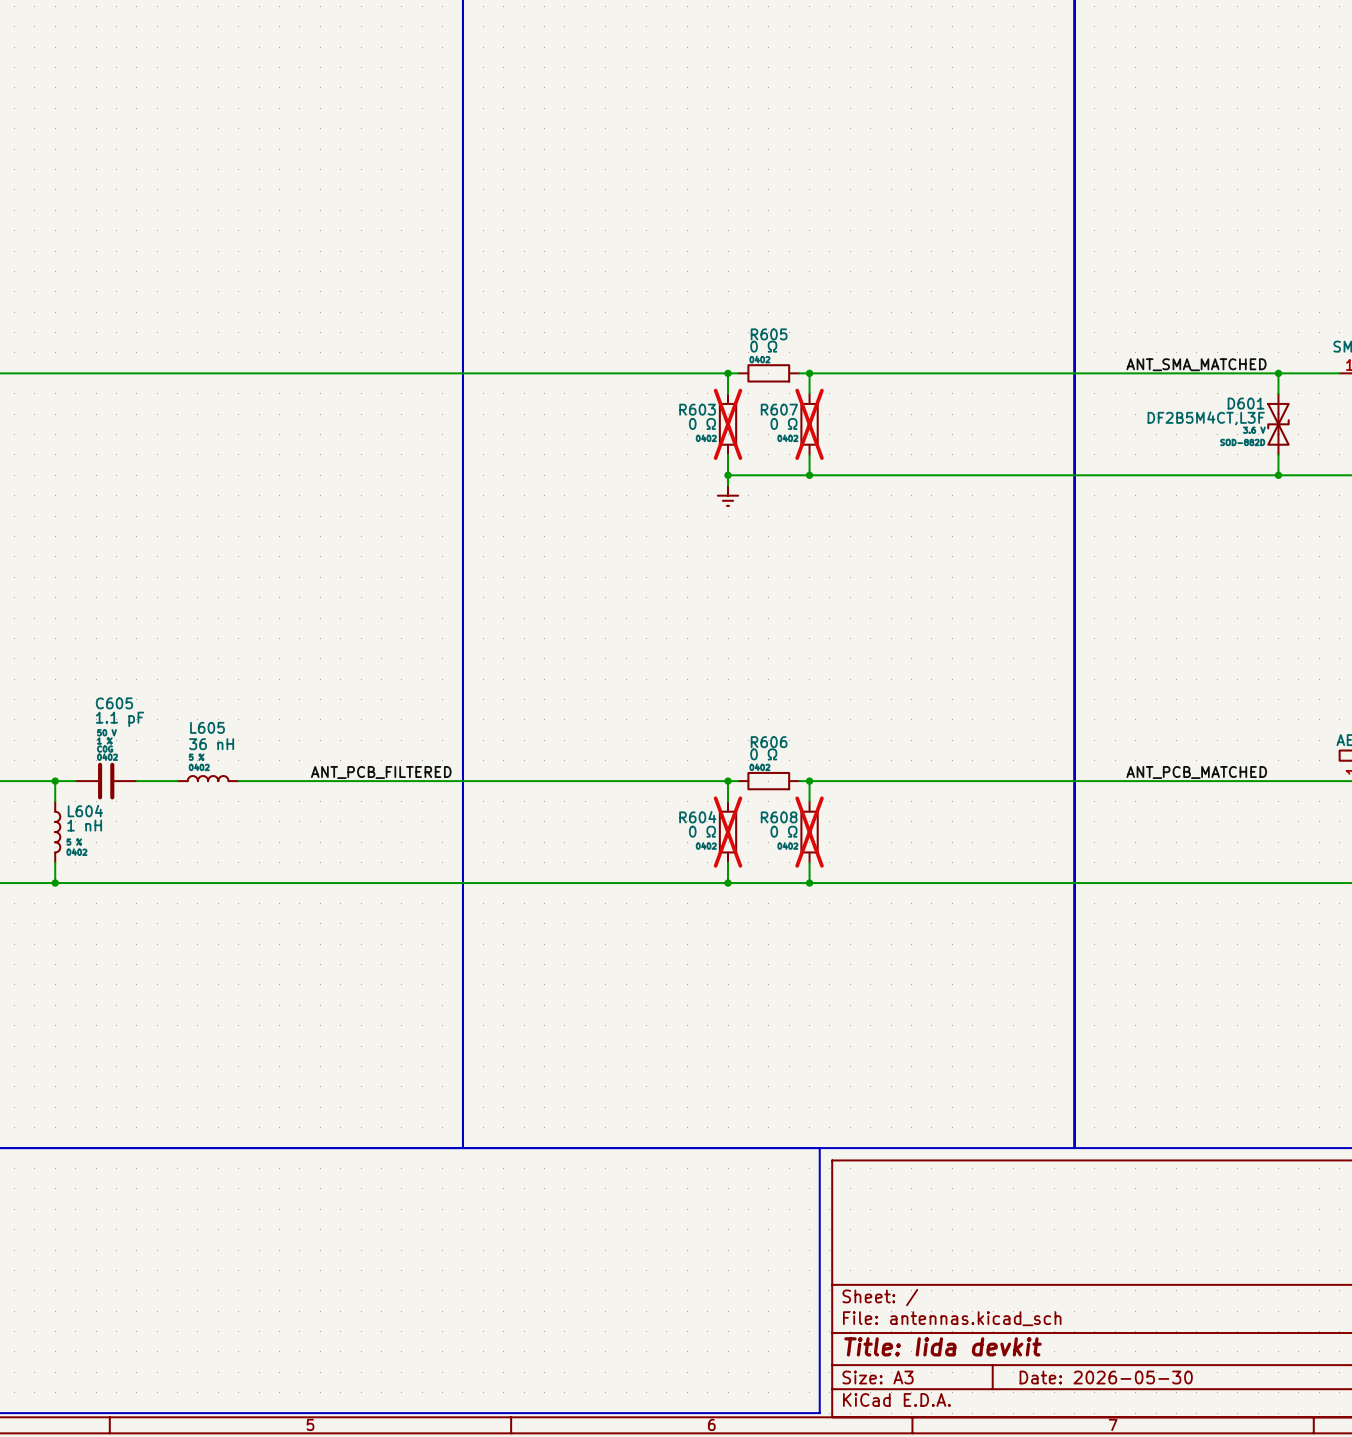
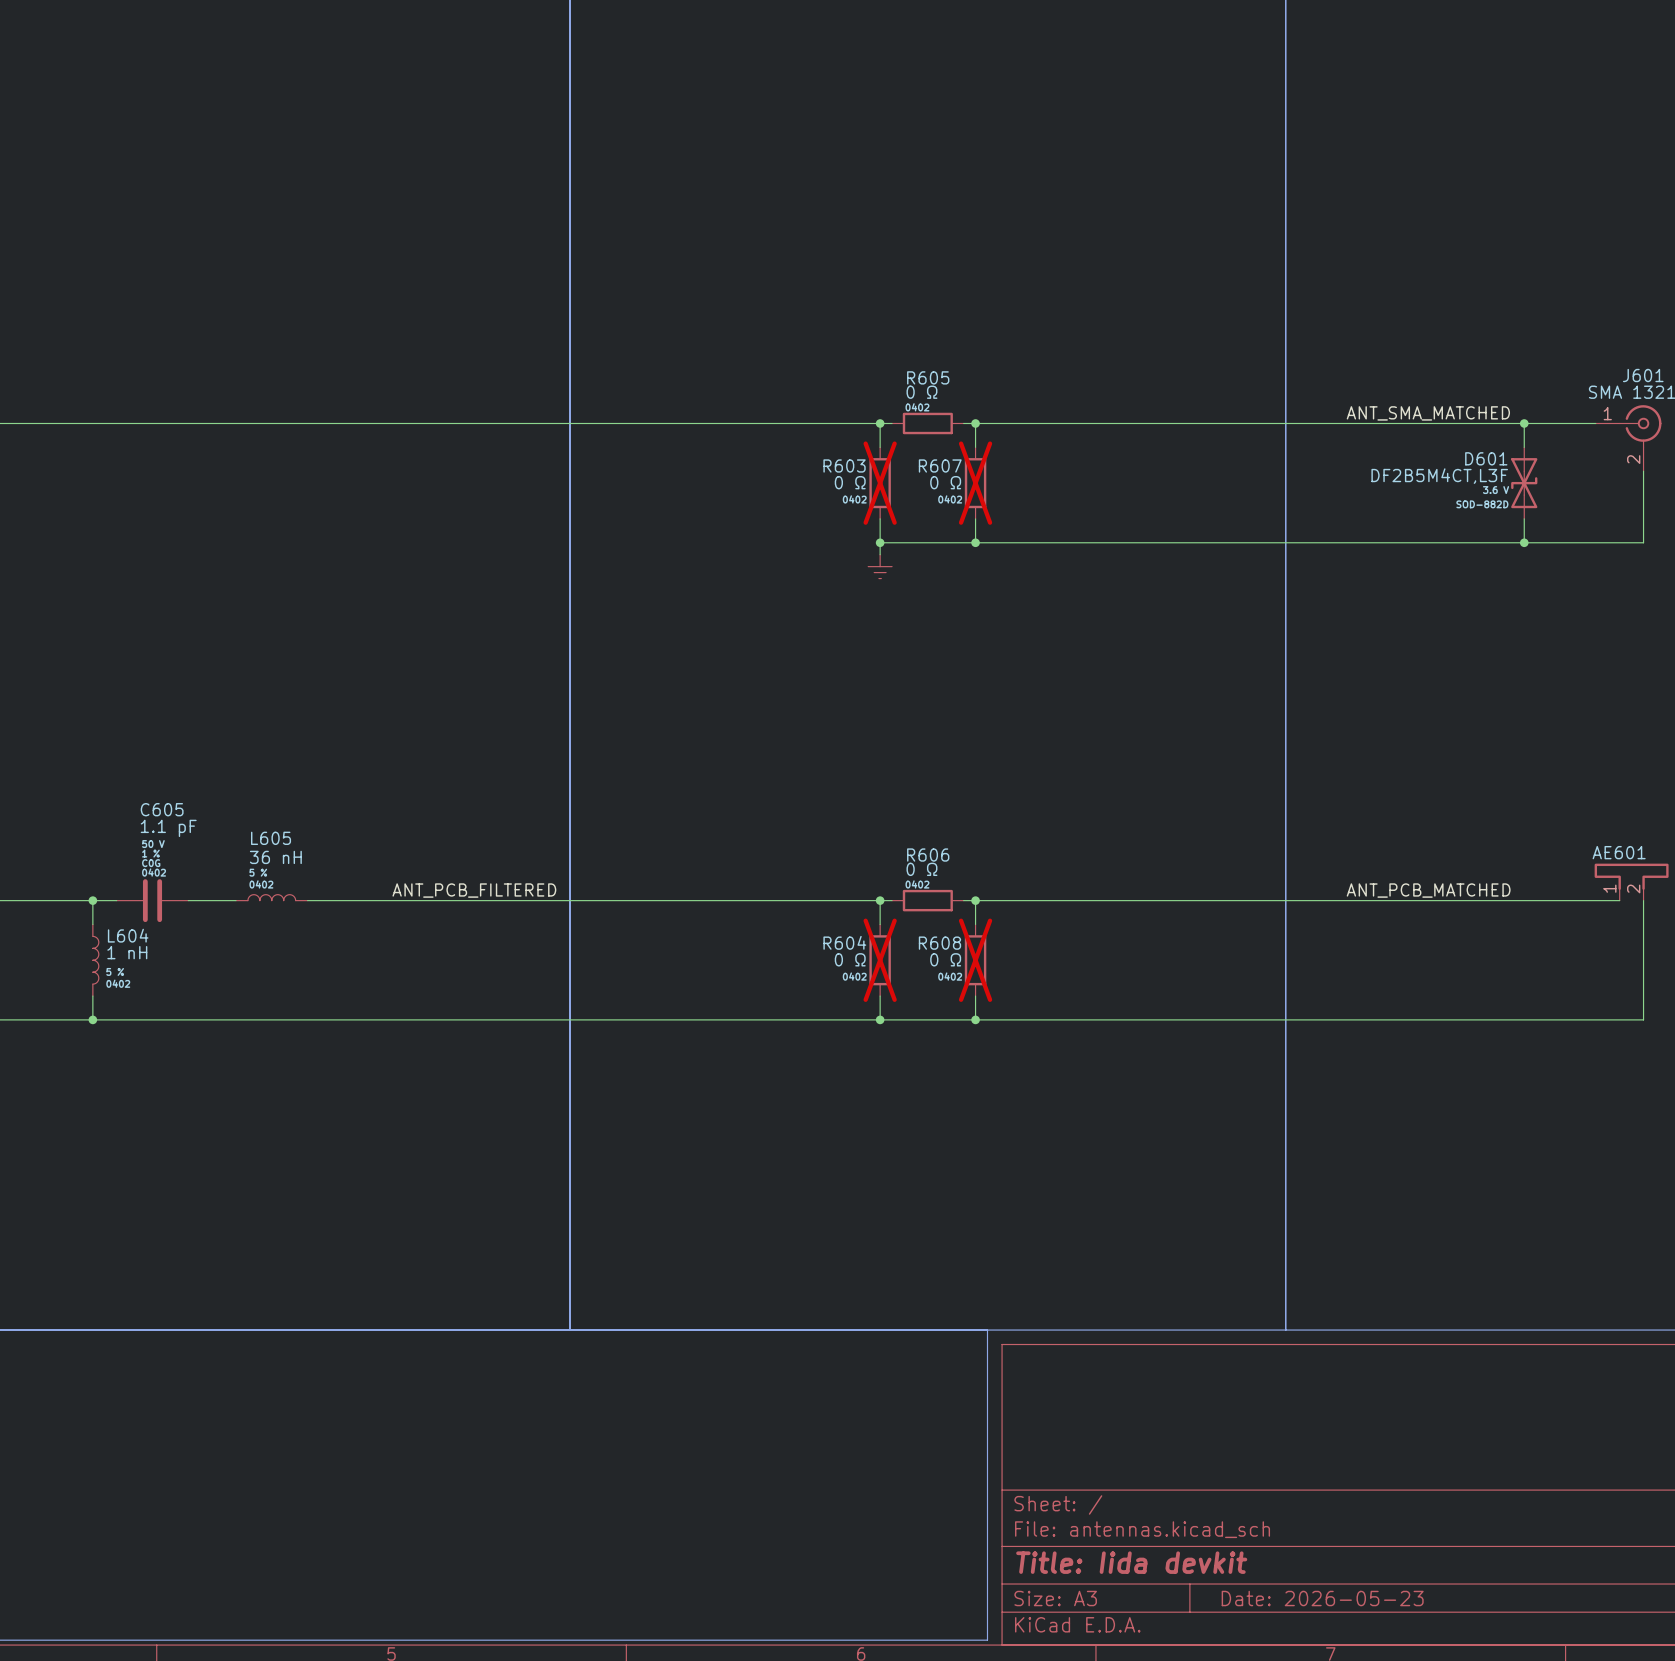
title block: Date: 2026-05-30 (1106, 1377) -> Date: 2026-05-23 (1322, 1598)

